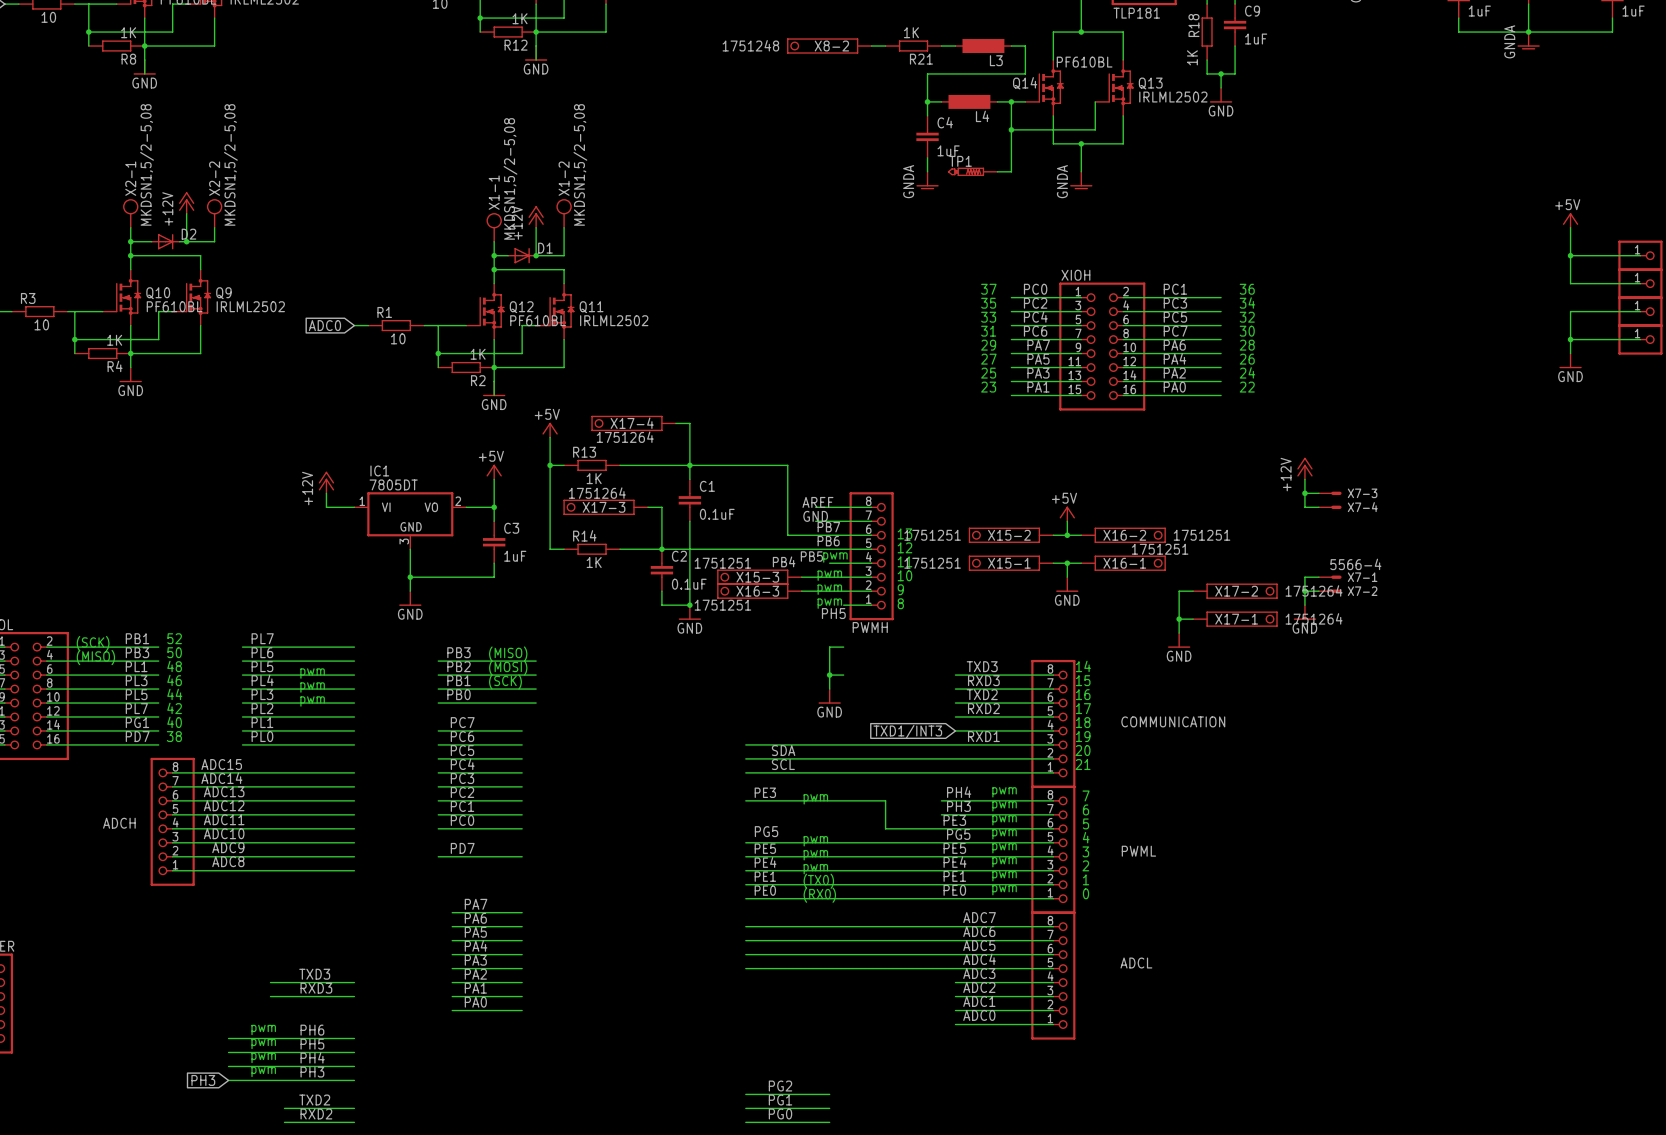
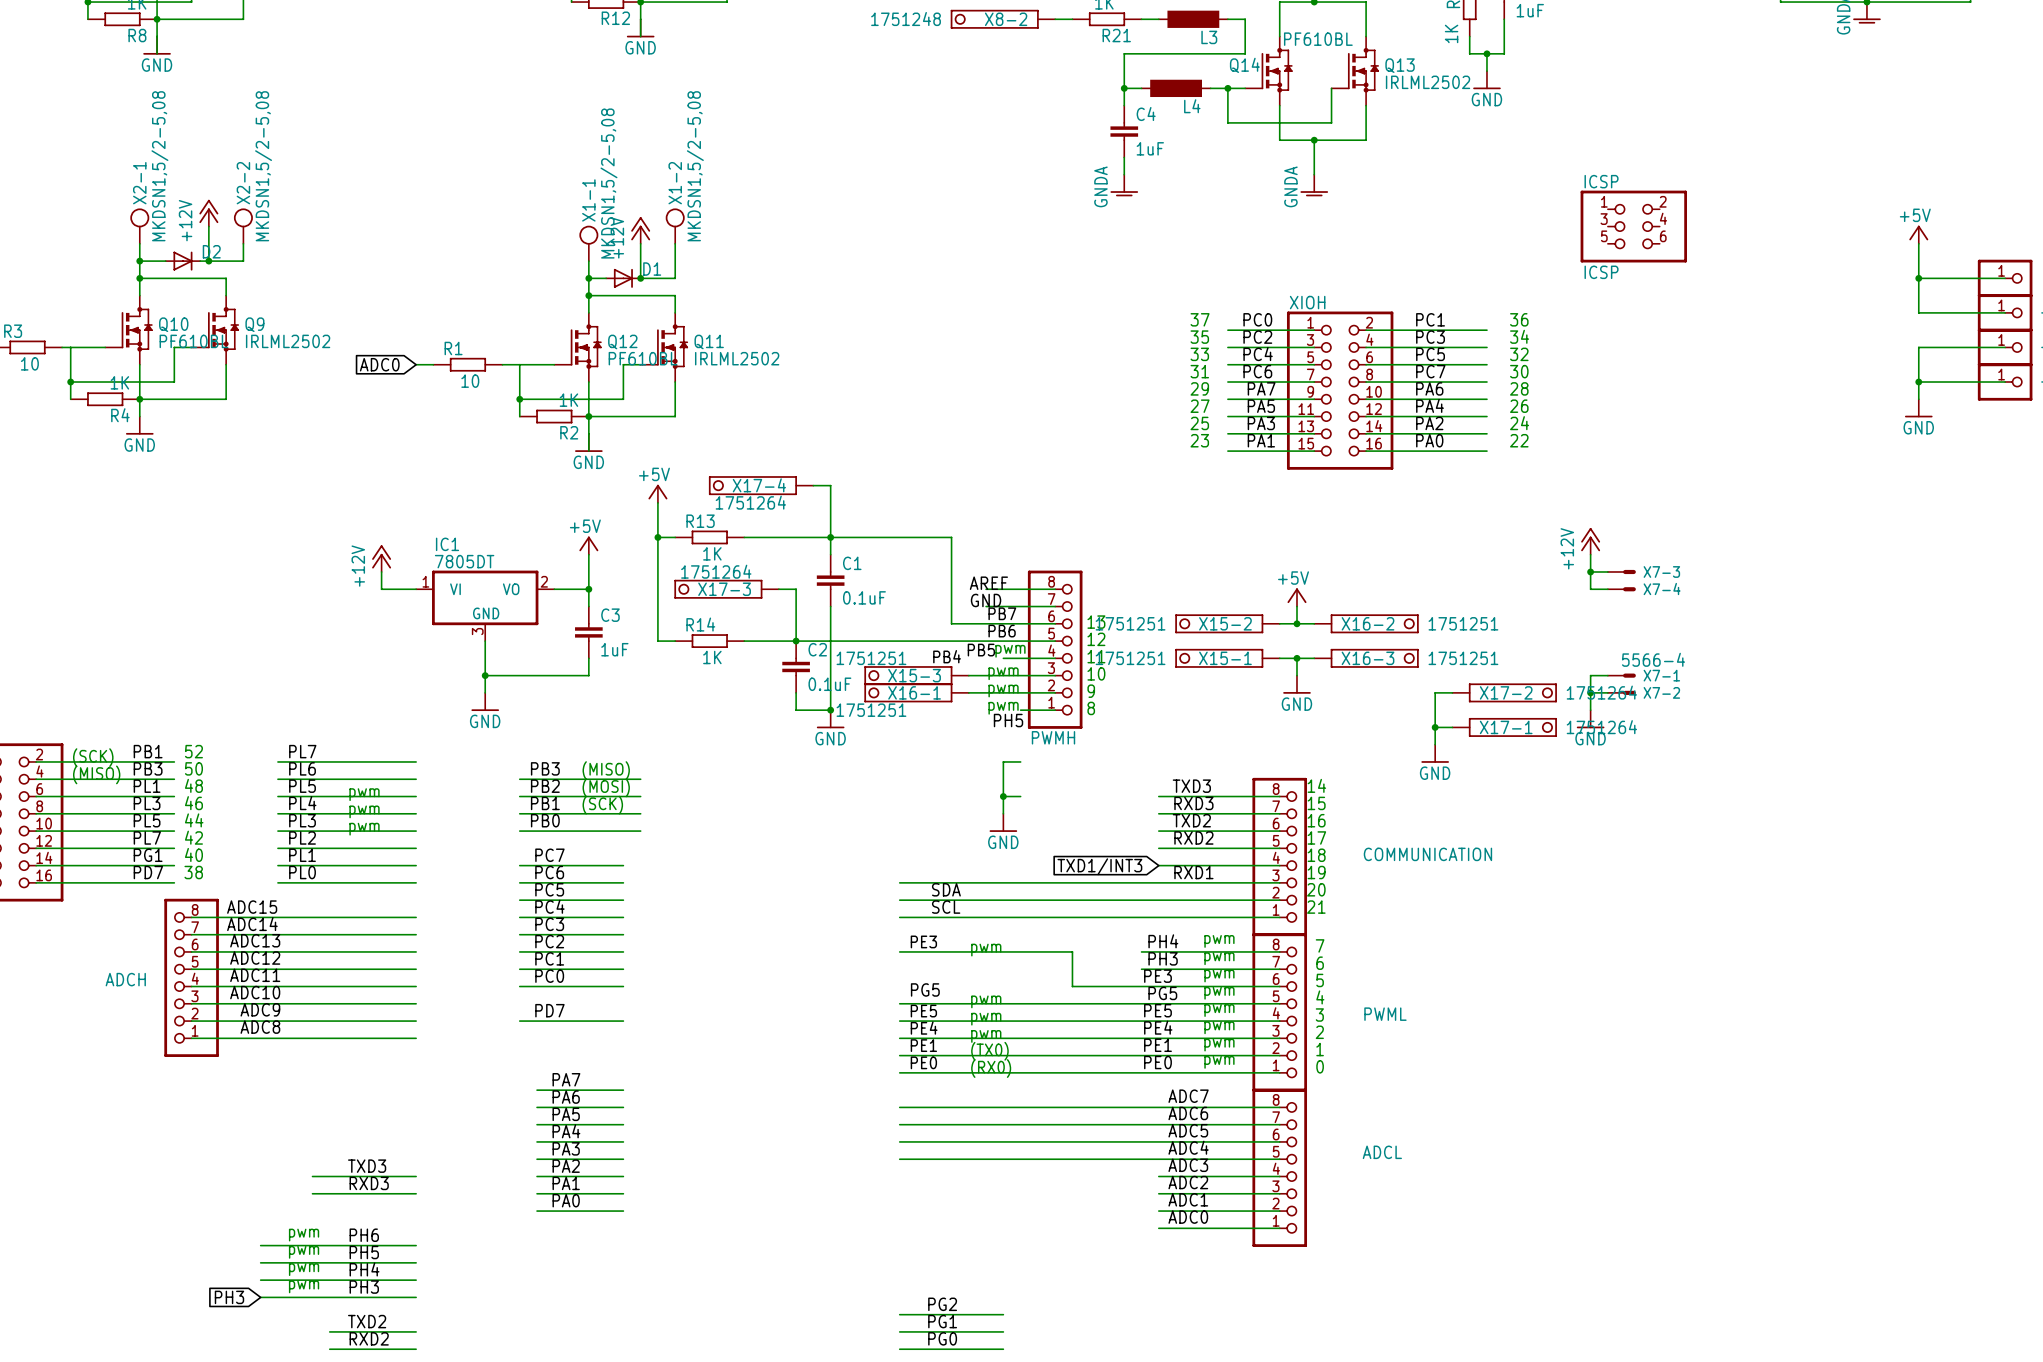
wire: (1011, 129) (1011, 171) (997, 171) -> none
junction: (1011, 129) -> none
TP1: (972, 171) -> none
ICSP: none -> ICSP (1633, 226)
X16-1 value position: 1751251 (1160, 549) -> 1751251 (1463, 658)
X16-1 name: X16-1 (1124, 563) -> X16-3 (1368, 658)
X16-3 name: X16-3 (757, 591) -> X16-1 (914, 692)

